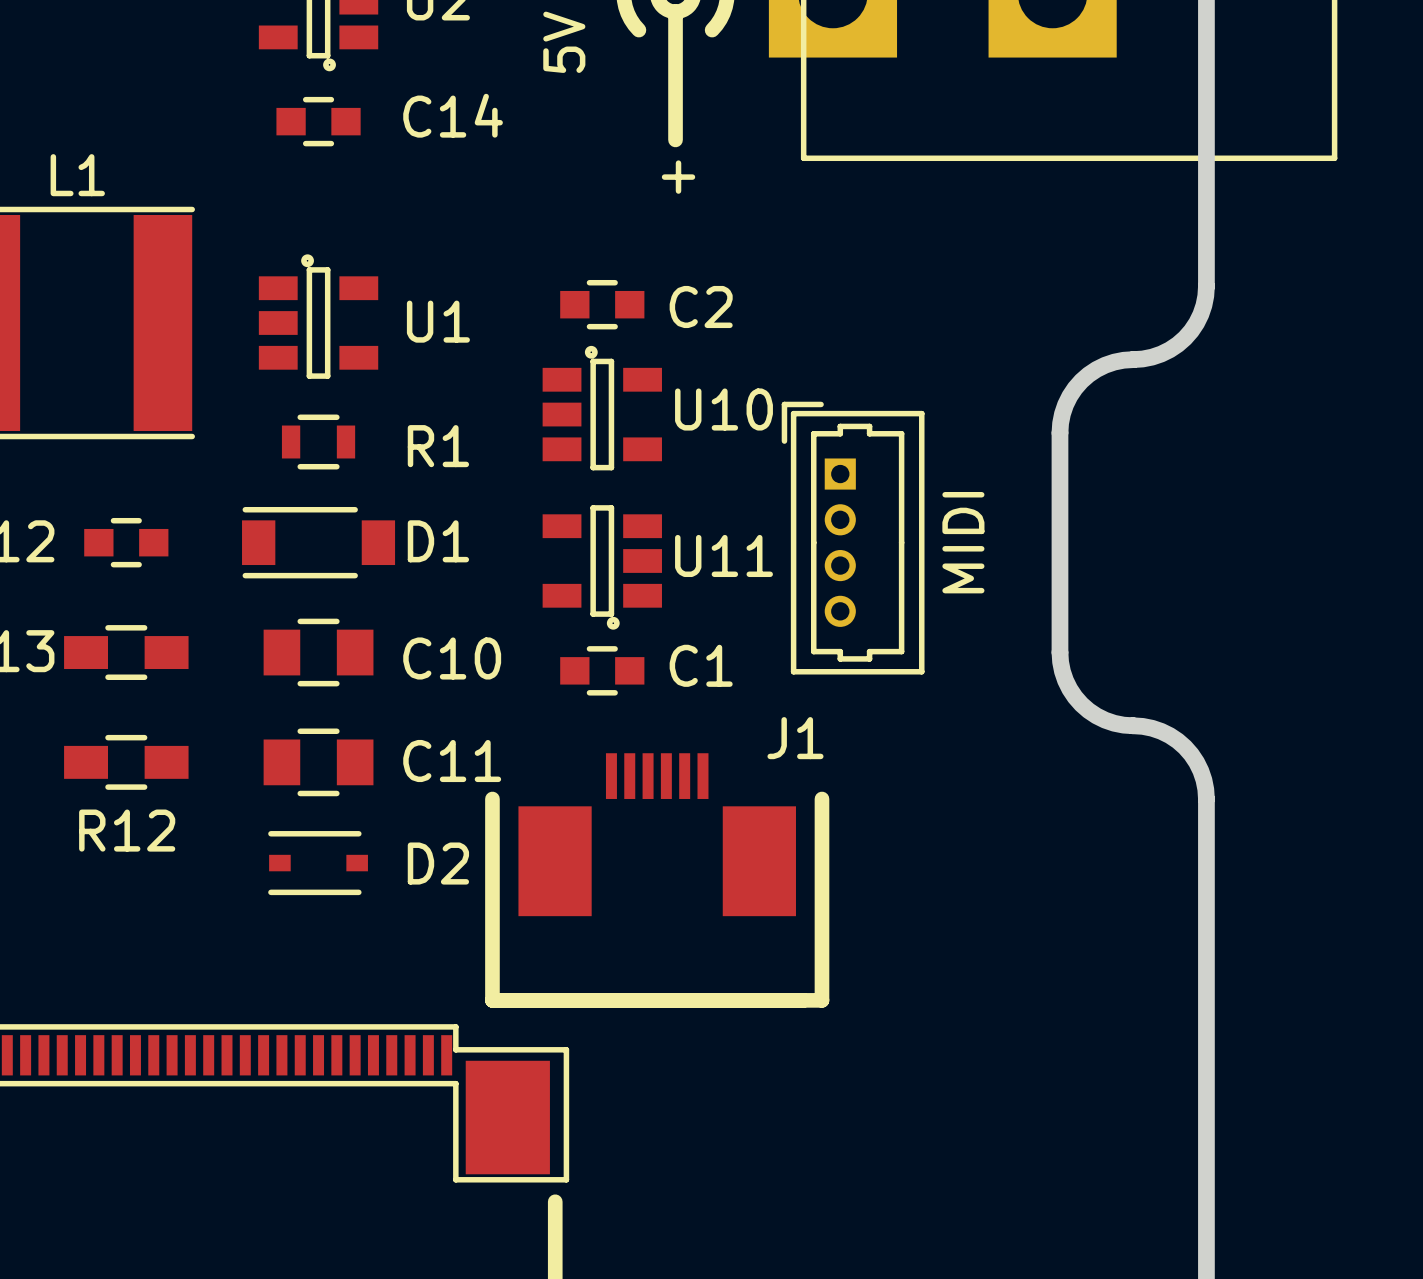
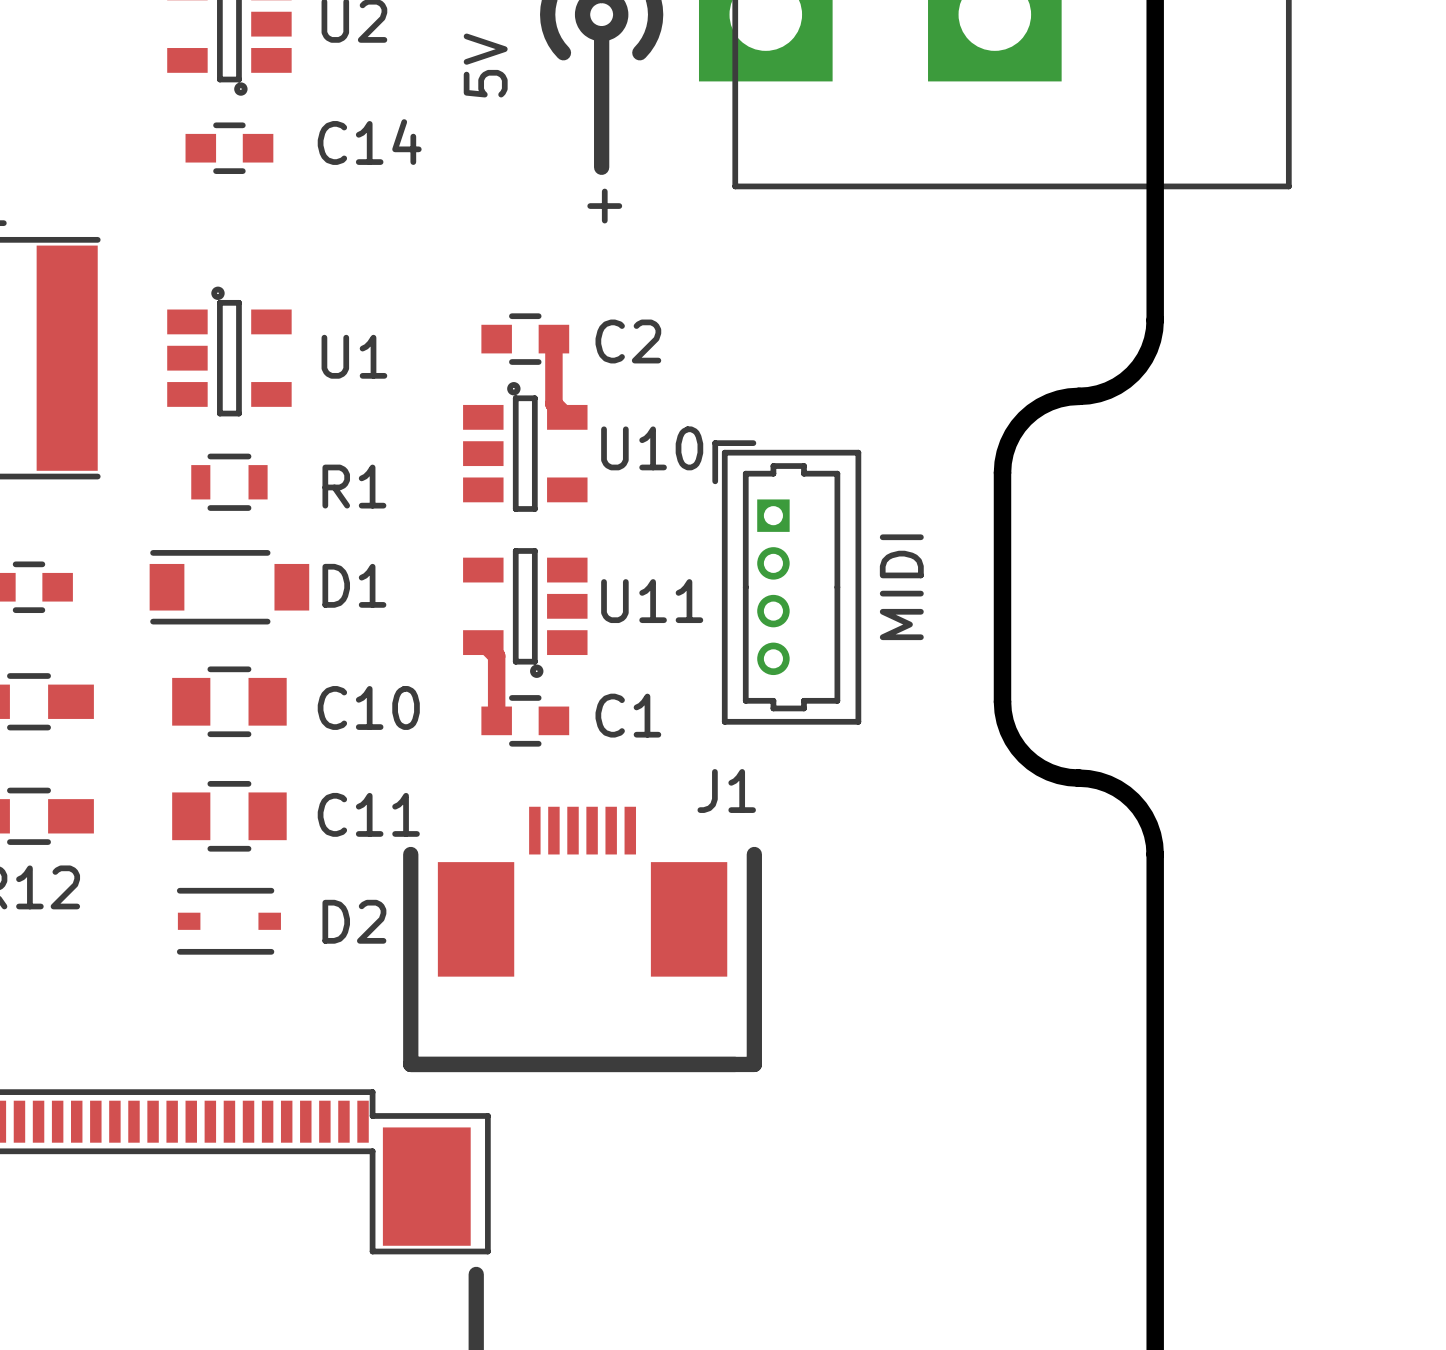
track: none -> (553, 339) (553, 404) (567, 417)
track: none -> (483, 642) (496, 655) (496, 720)

